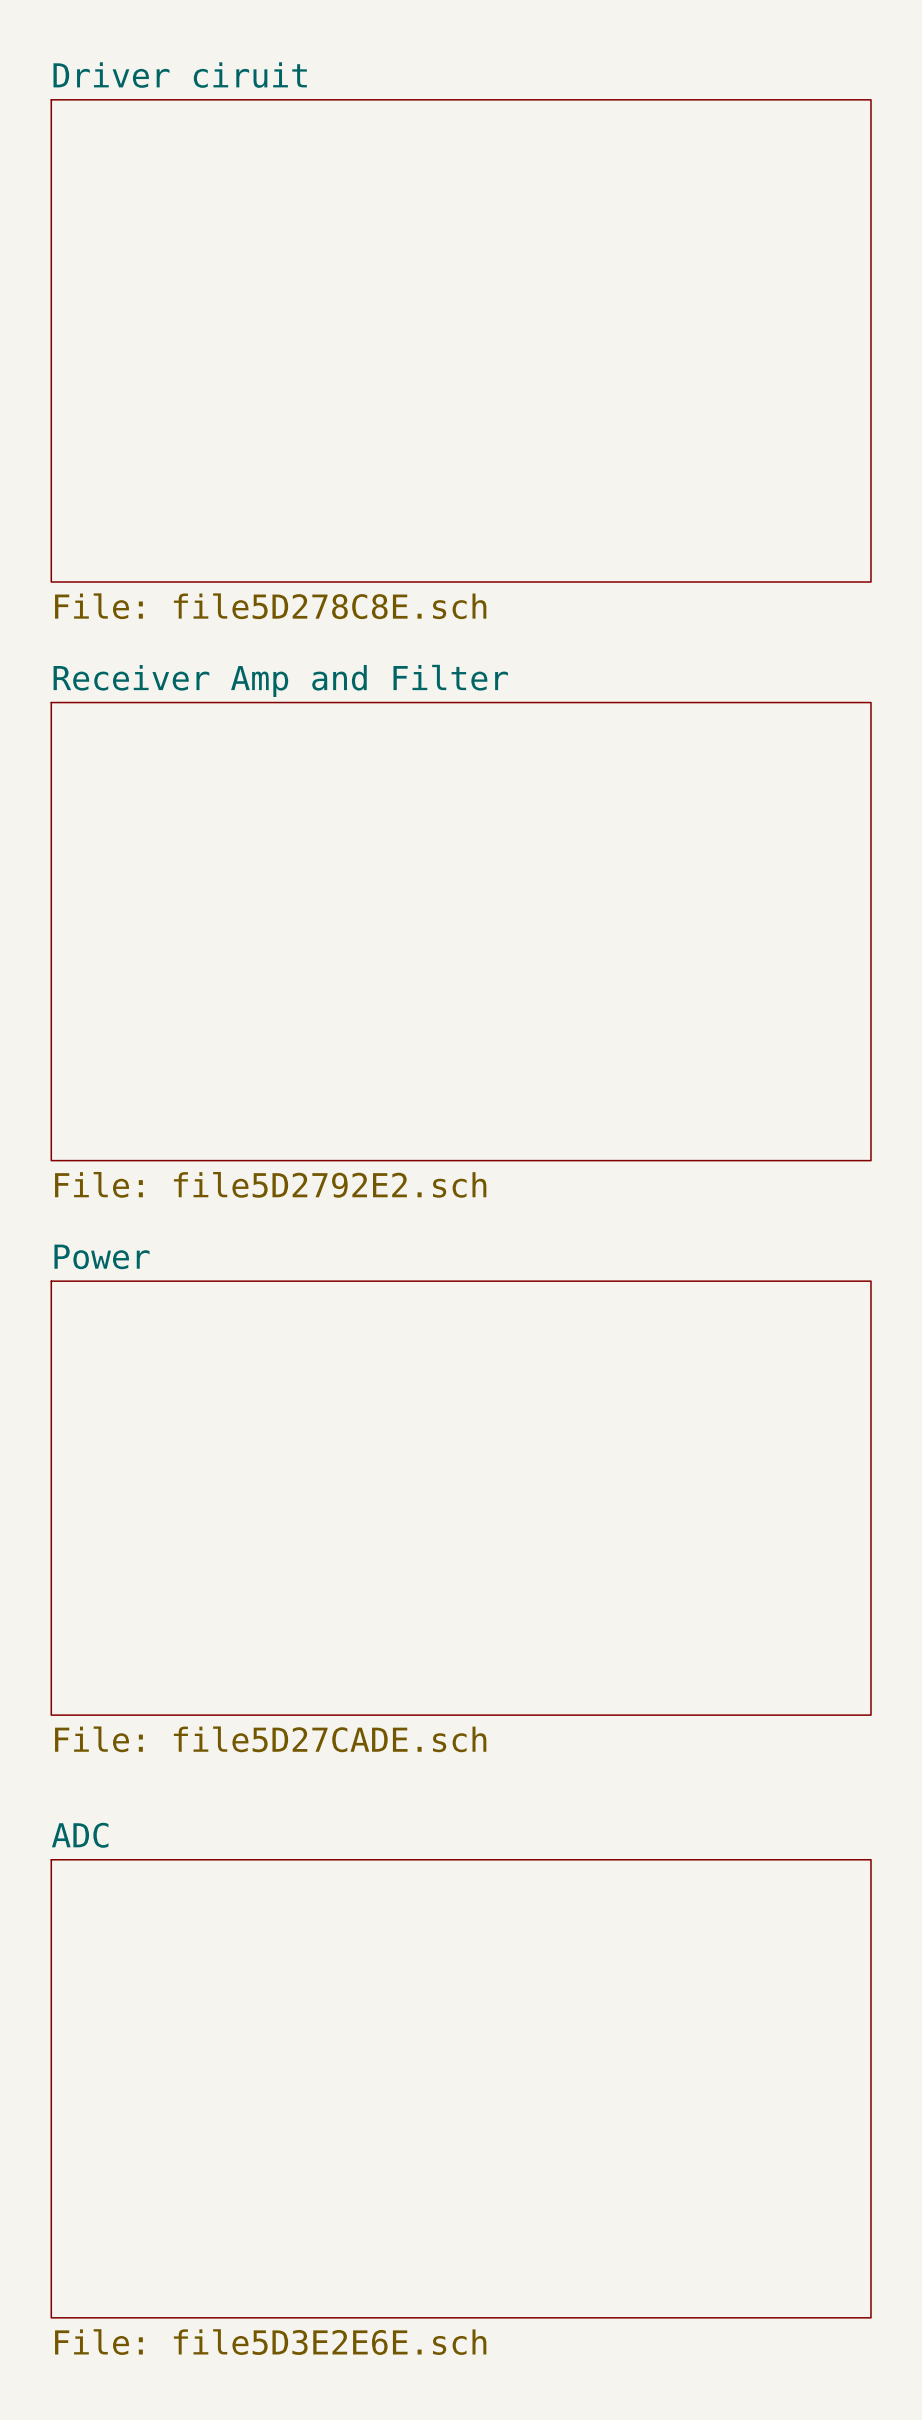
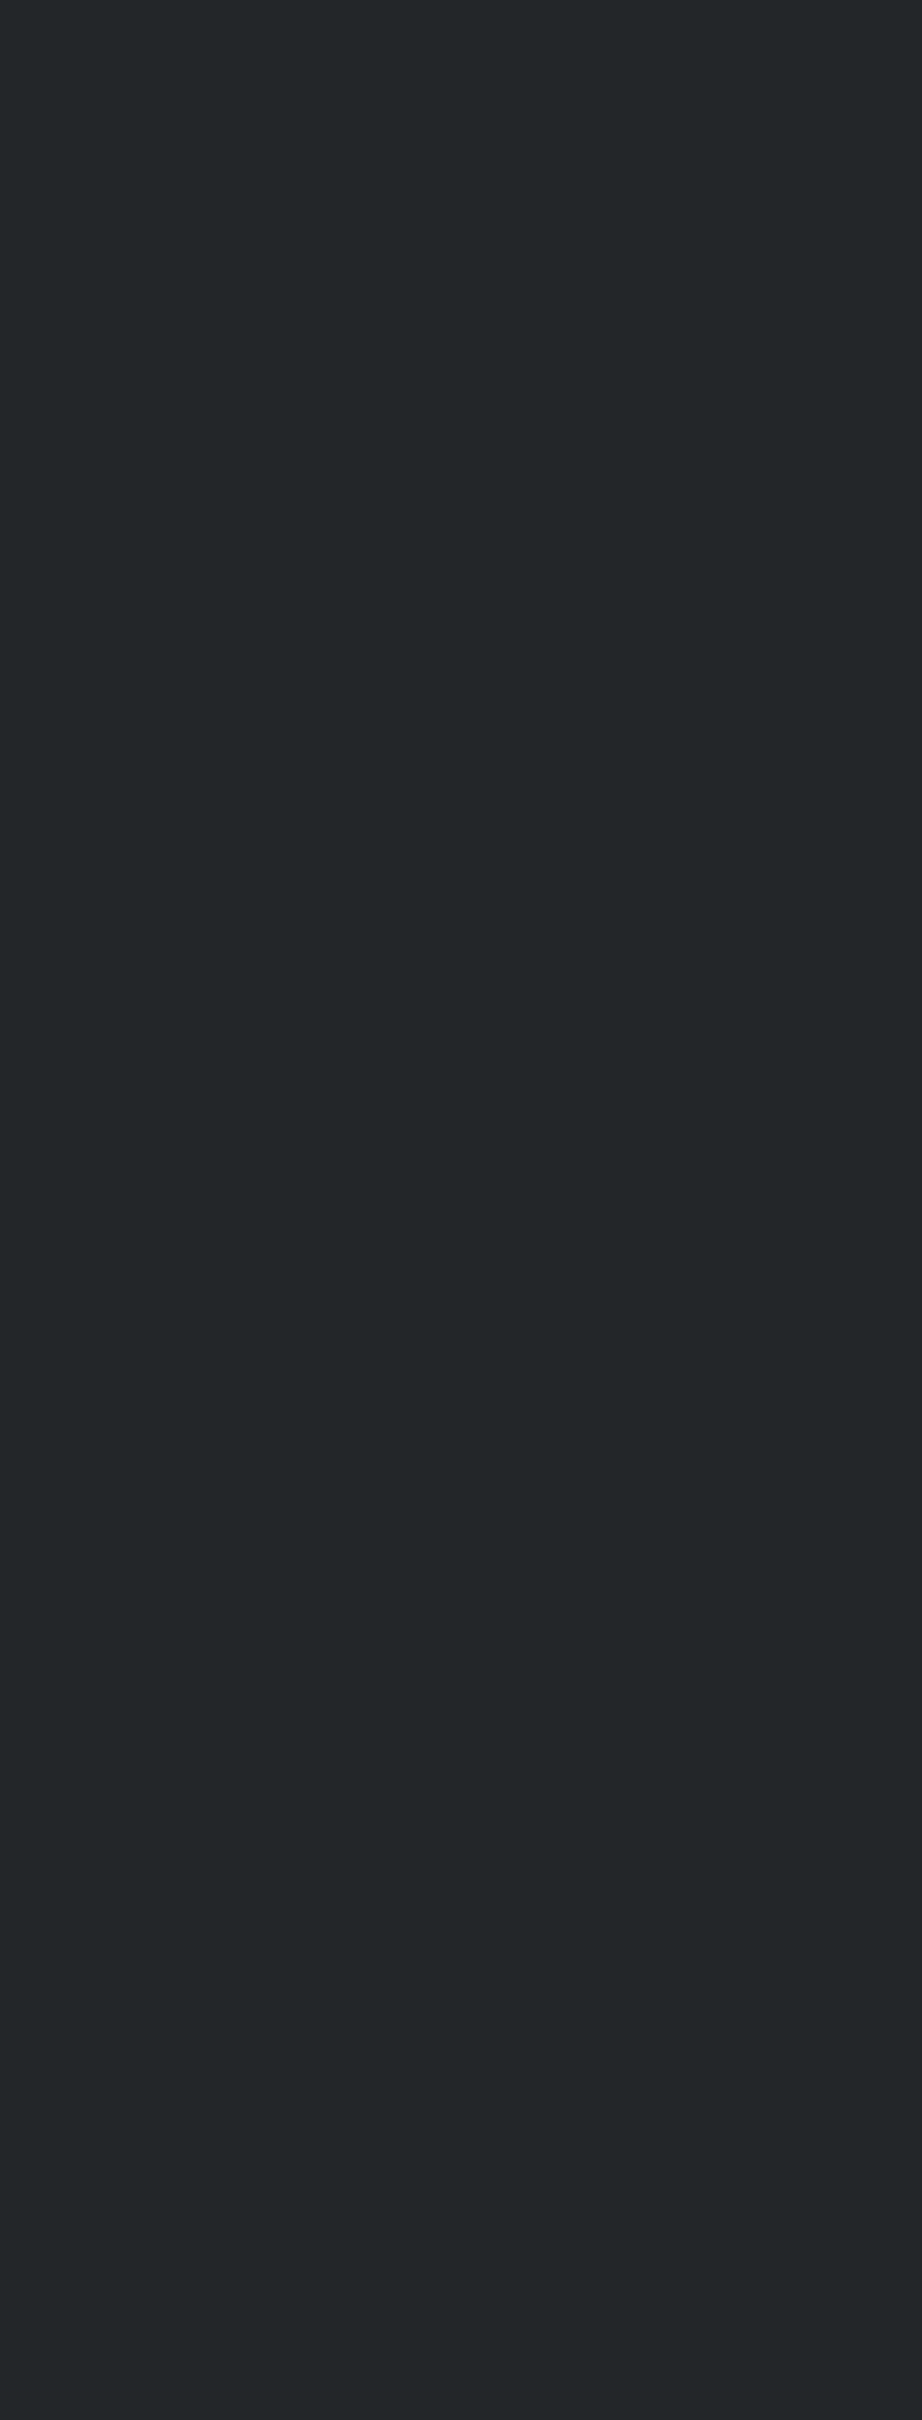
sheet Driver ciruit: File: file5D278C8E.sch (461, 340) -> none
sheet Receiver Amp and Filter: File: file5D2792E2.sch (461, 931) -> none
sheet Power: File: file5D27CADE.sch (461, 1498) -> none
sheet ADC: File: file5D3E2E6E.sch (461, 2088) -> none

